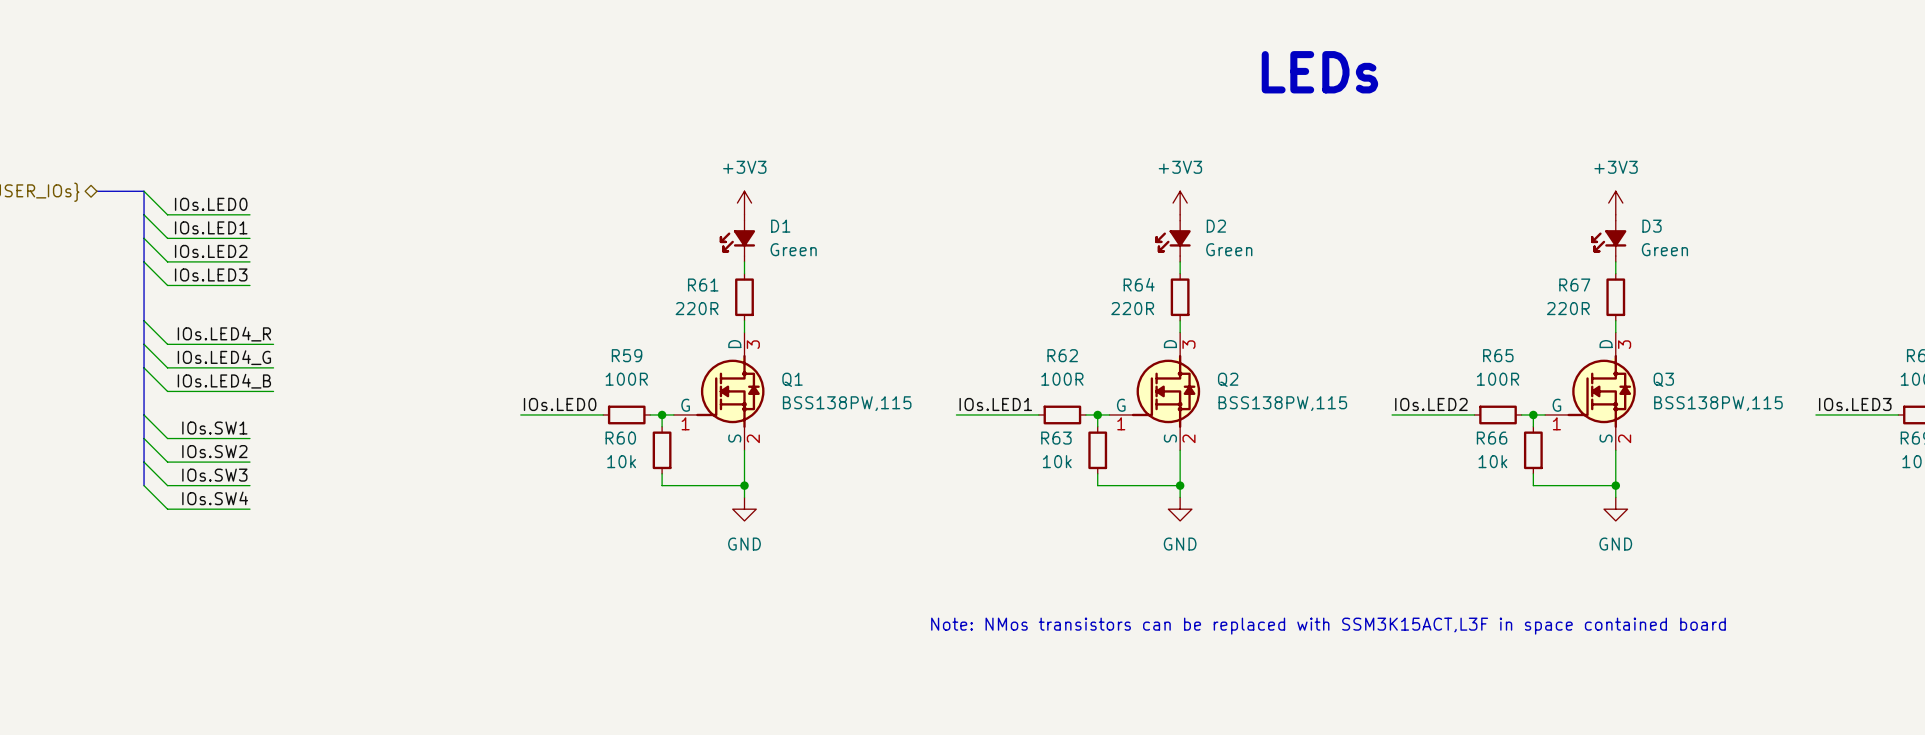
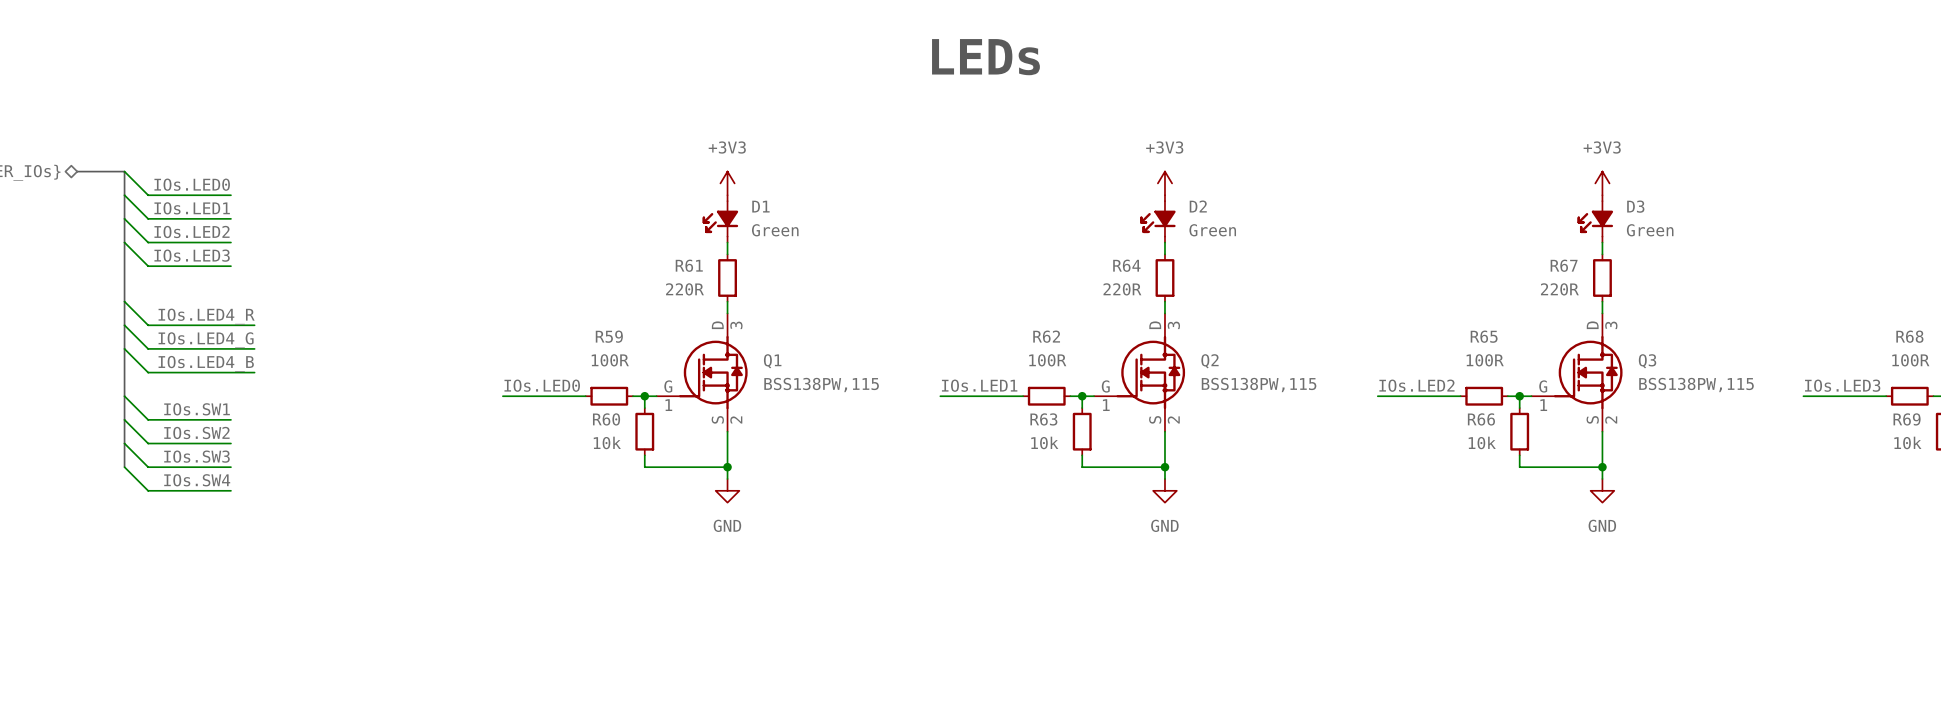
text: LEDs (1319, 72) -> none
text: none -> LEDs (985, 57)
text: Note: NMos transistors can be replaced with SSM3K15ACT,L3F in space contained board (1328, 626) -> none

